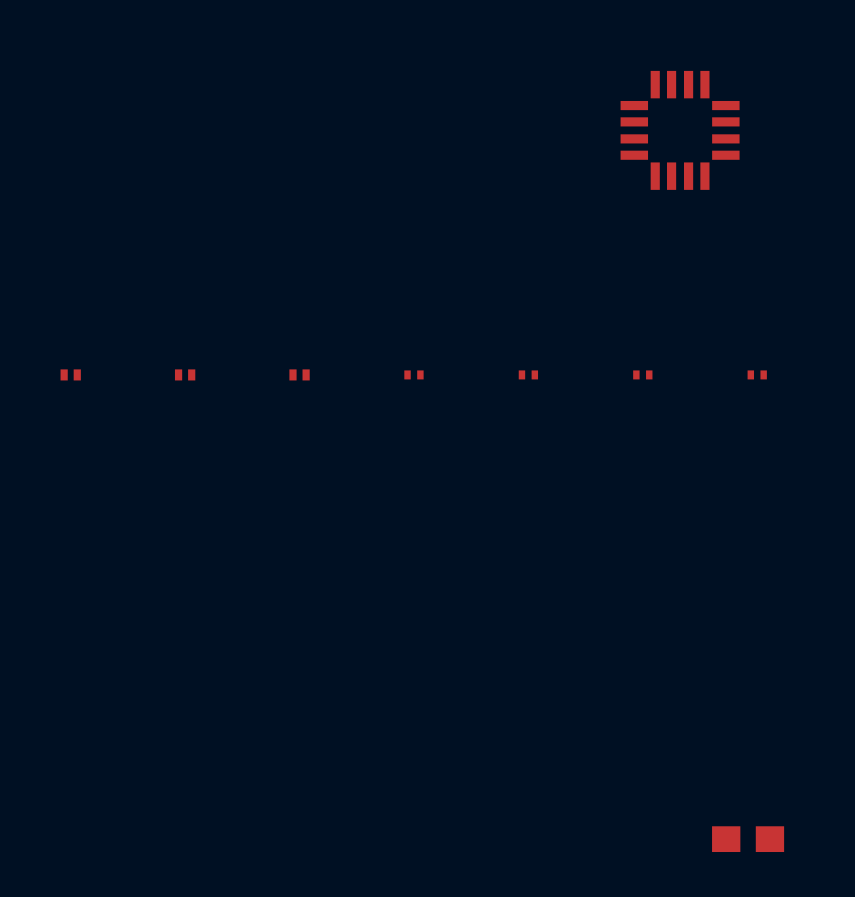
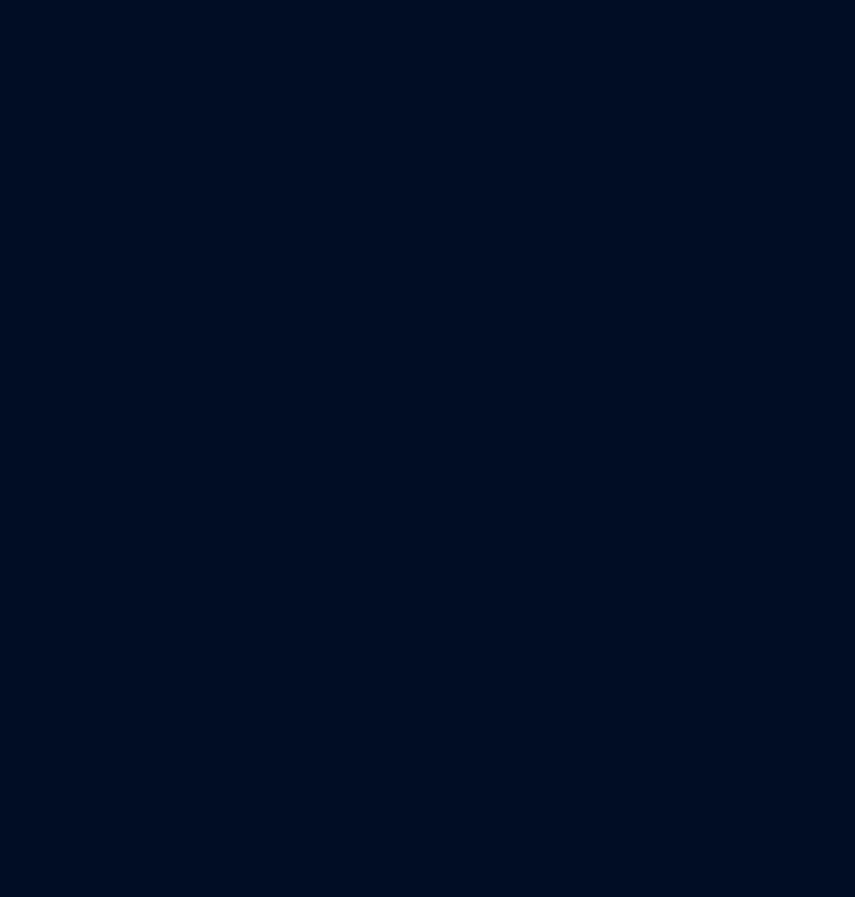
part: (680, 130) -> none
part: (70, 374) -> none
part: (185, 374) -> none
part: (299, 374) -> none
part: (413, 374) -> none
part: (528, 374) -> none
part: (642, 374) -> none
part: (757, 374) -> none
part: (748, 839) -> none

